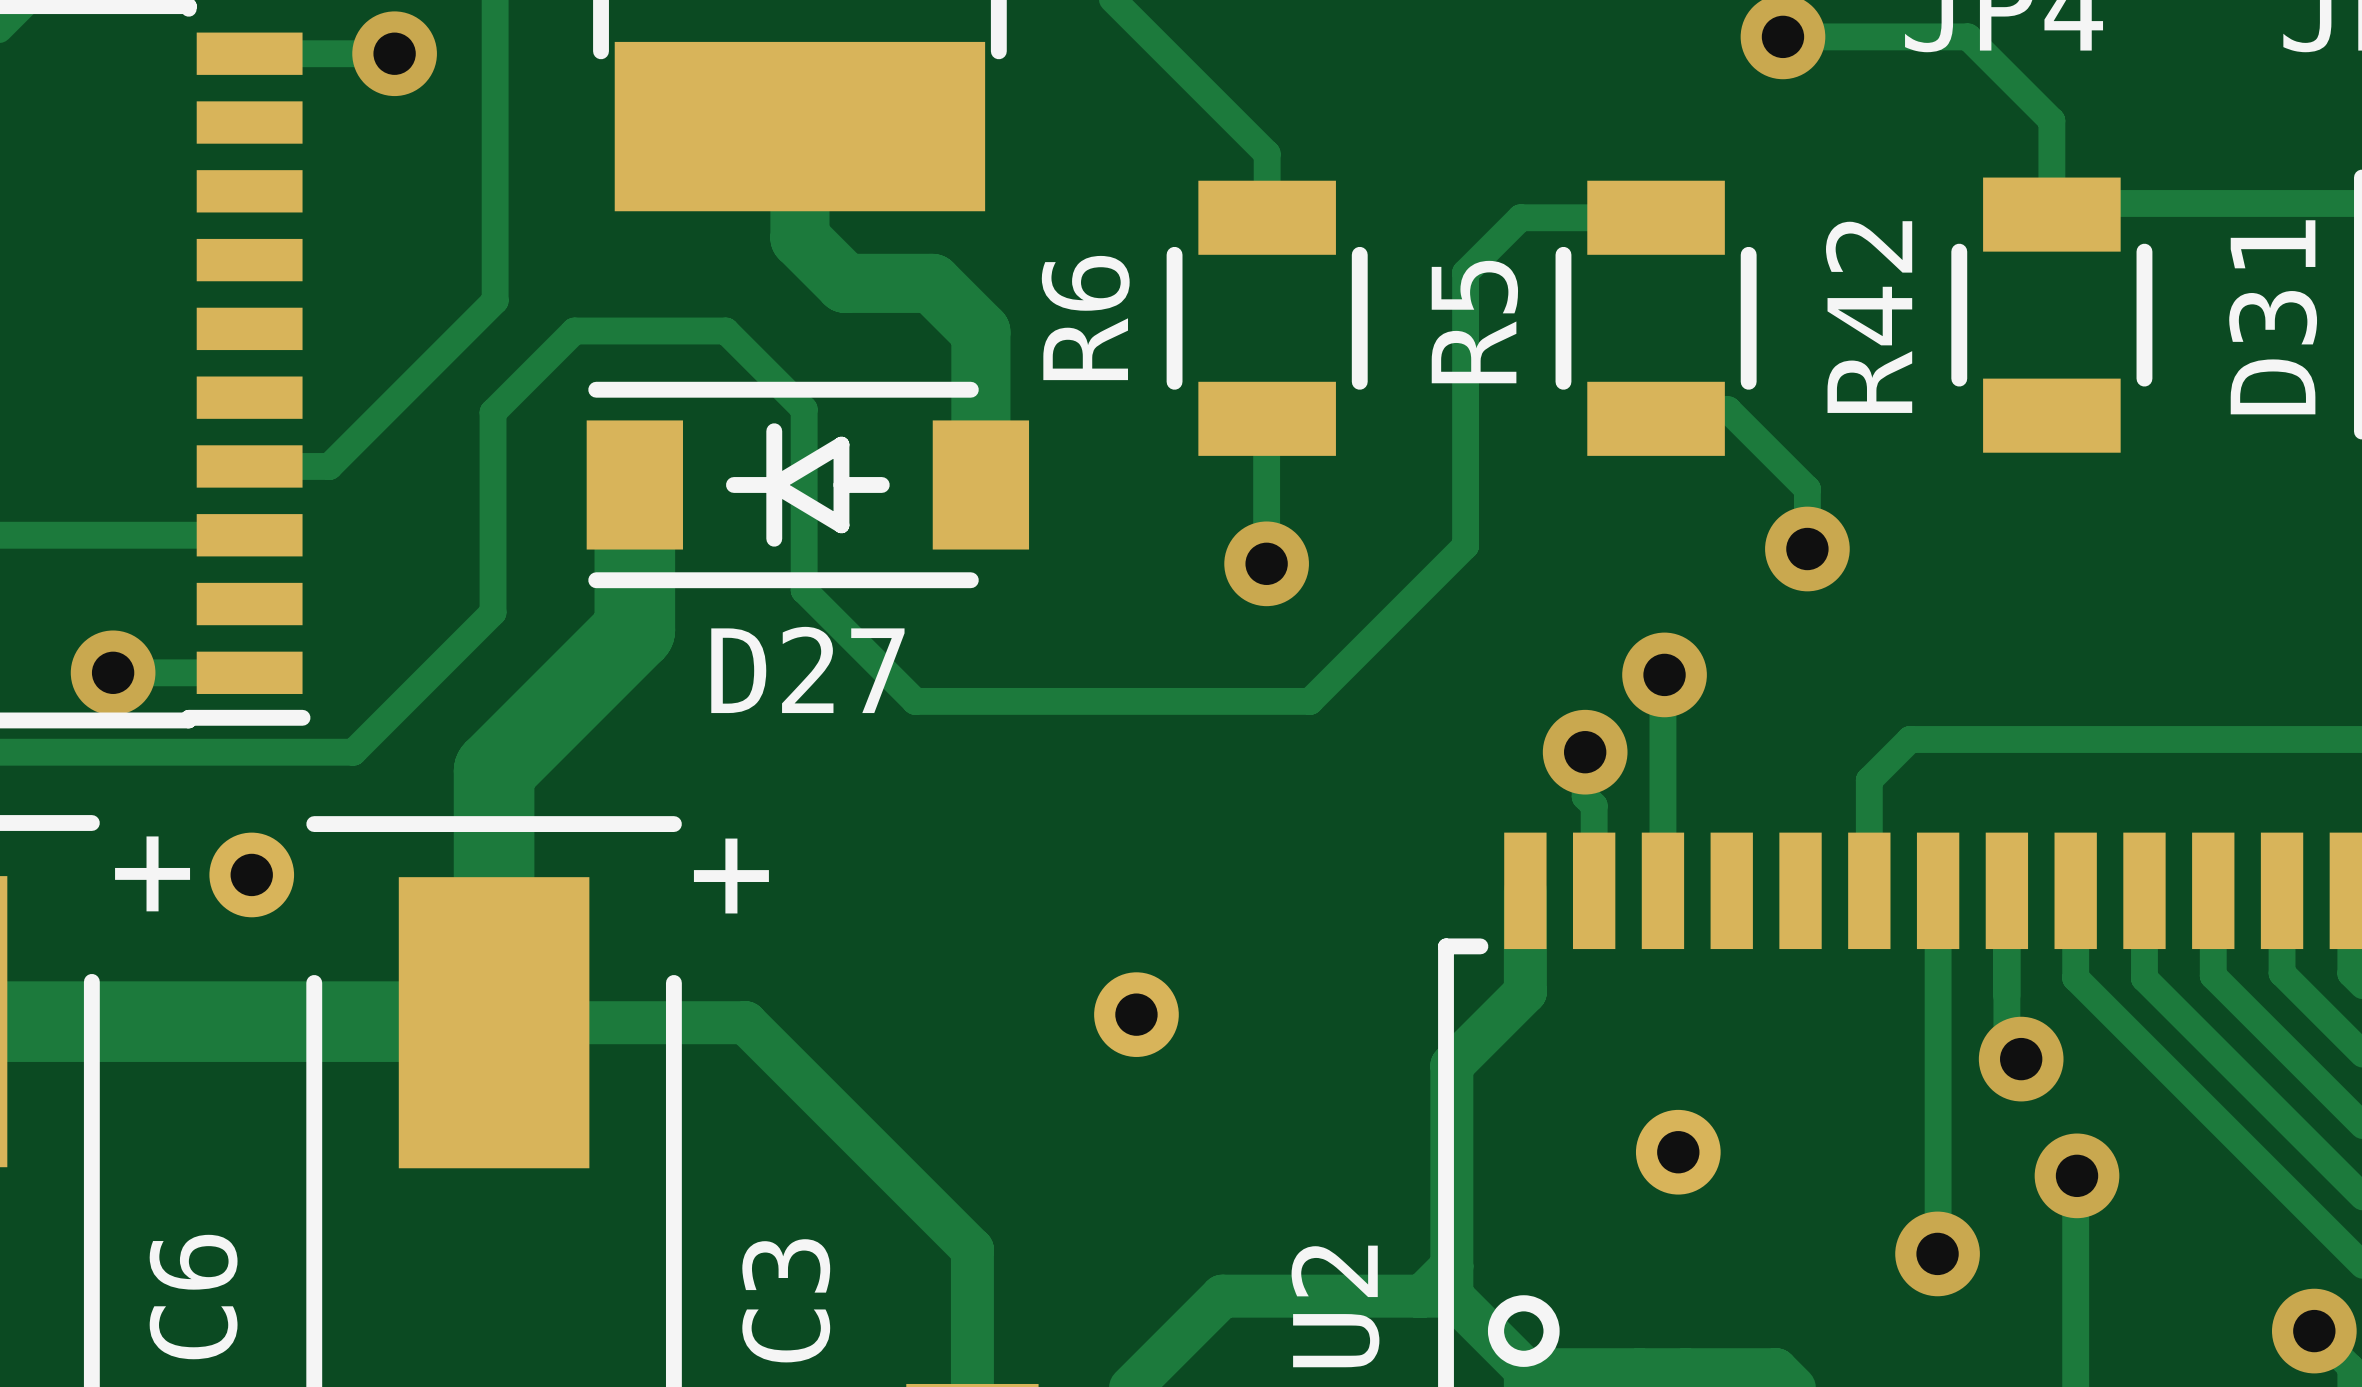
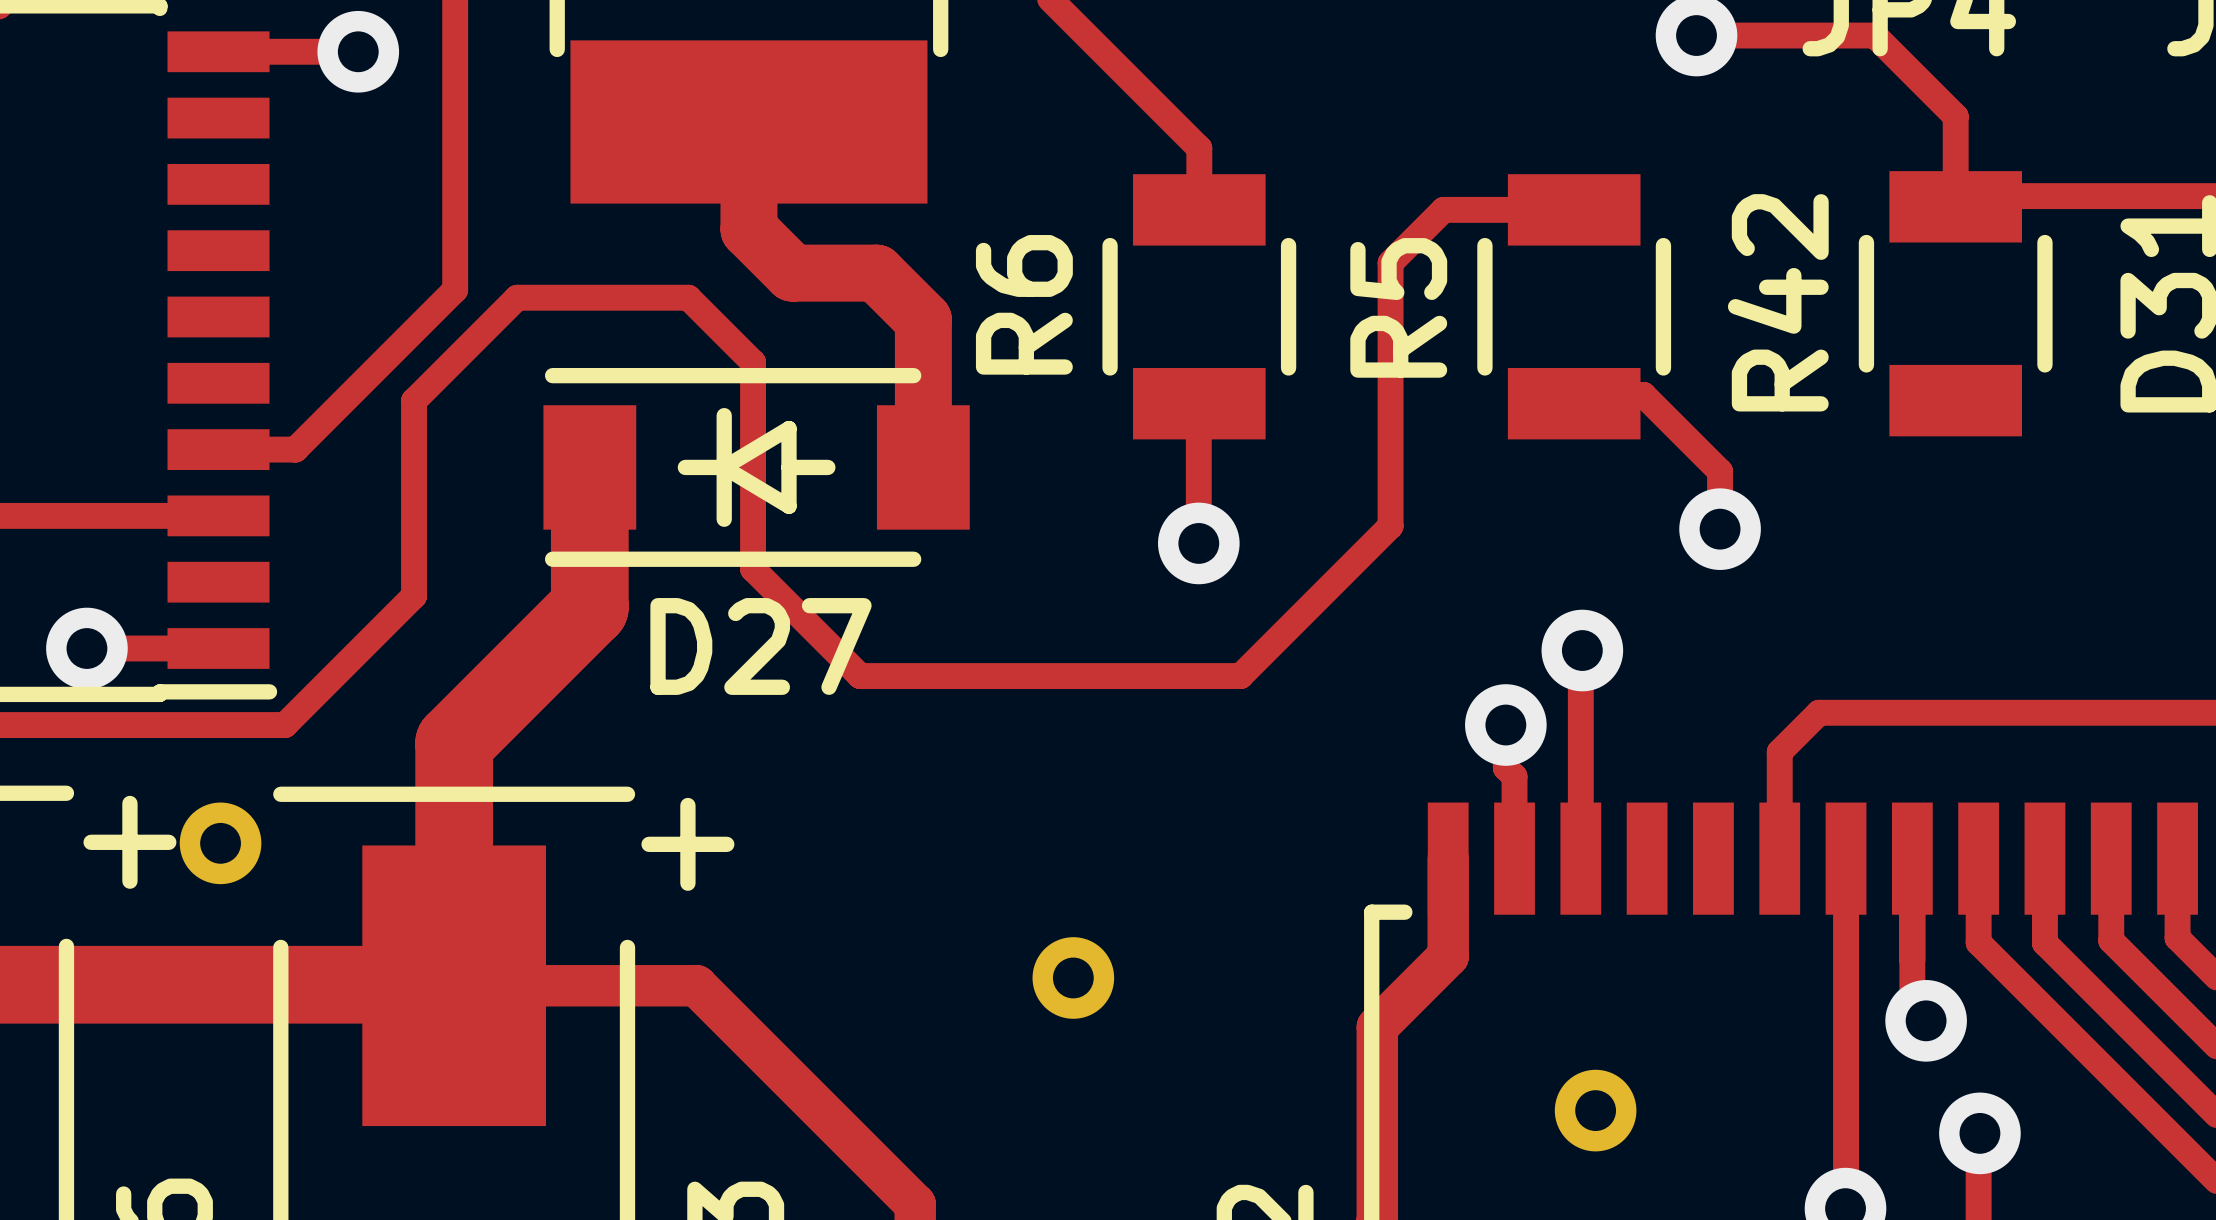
track: (804, 409) (725, 331) (574, 331) (493, 412) (493, 612) (353, 752) (318, 752) -> (753, 394) (753, 362) (688, 297) (517, 297) (414, 400) (414, 596) (285, 725)

